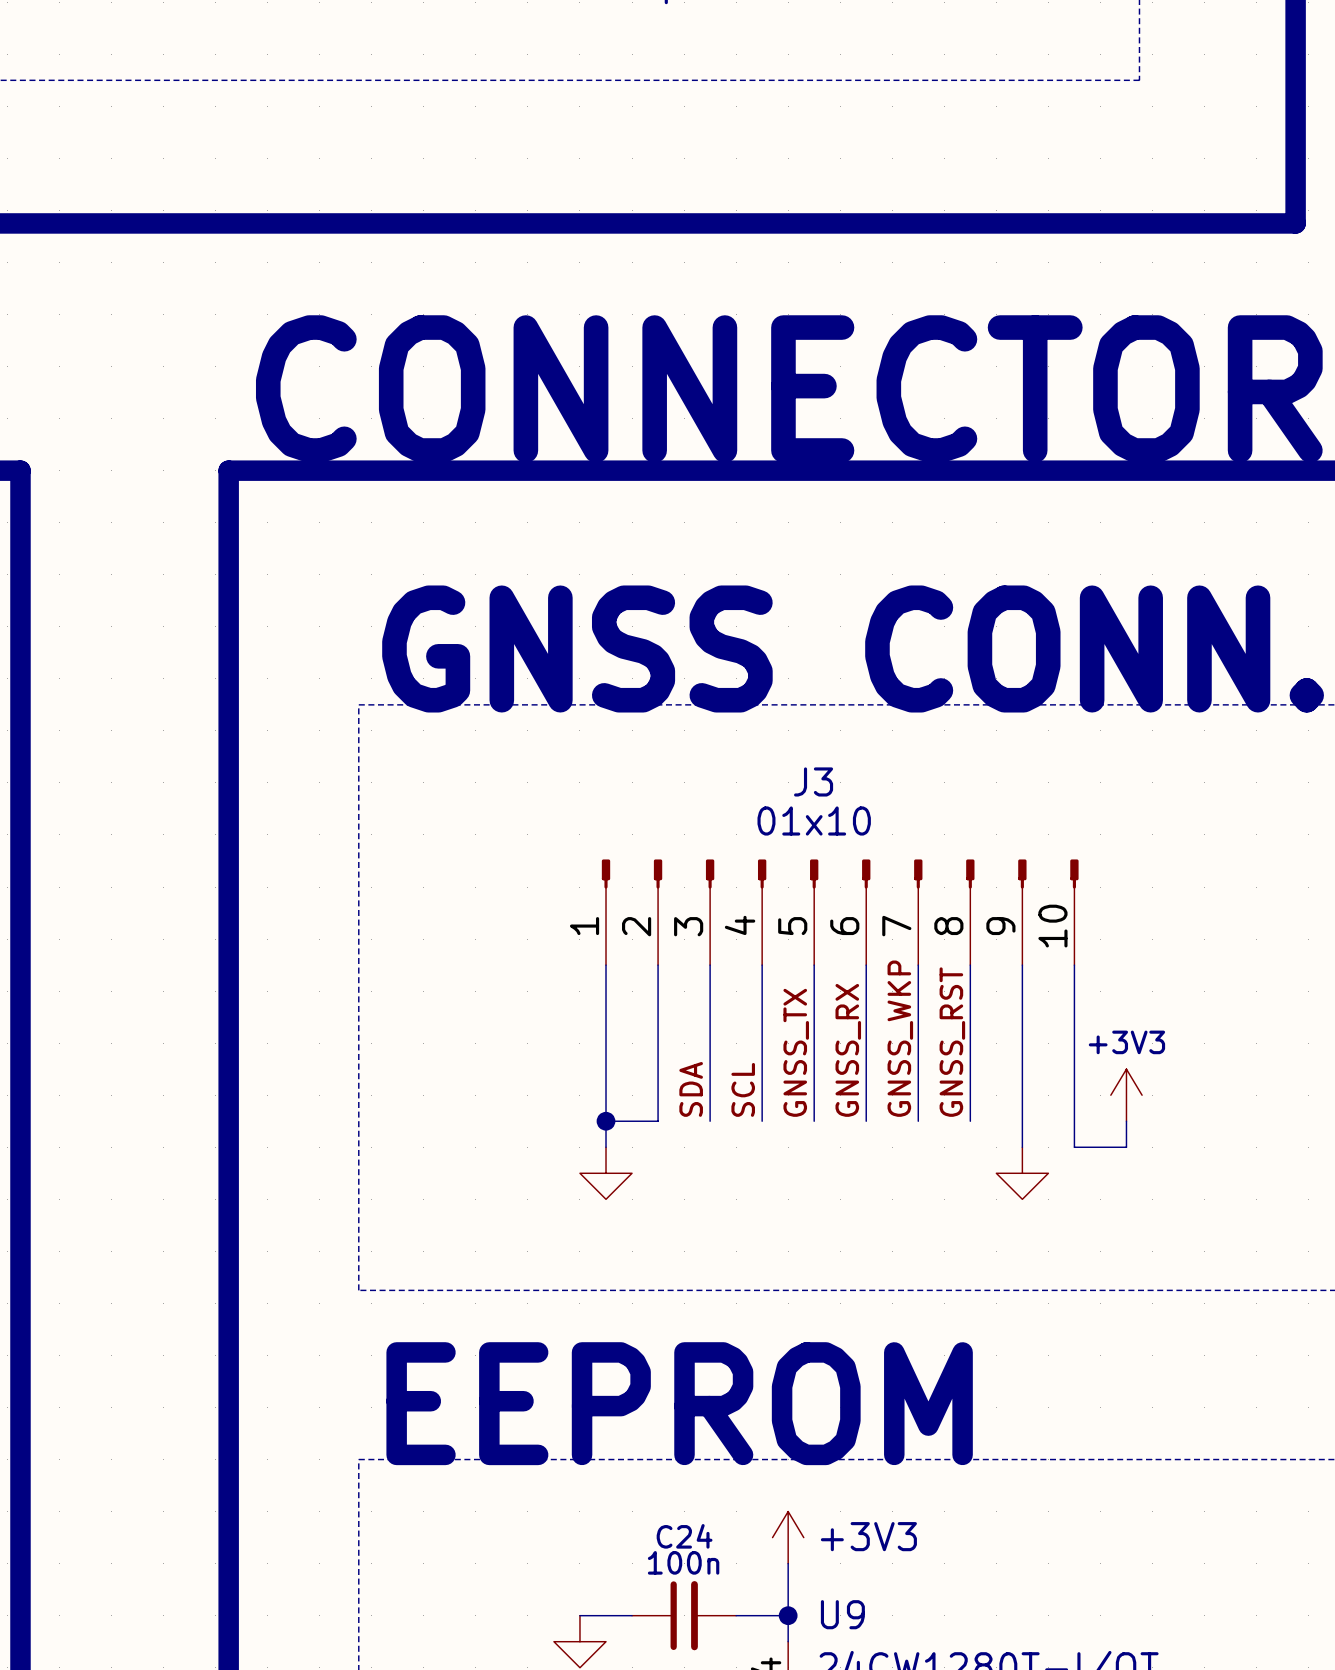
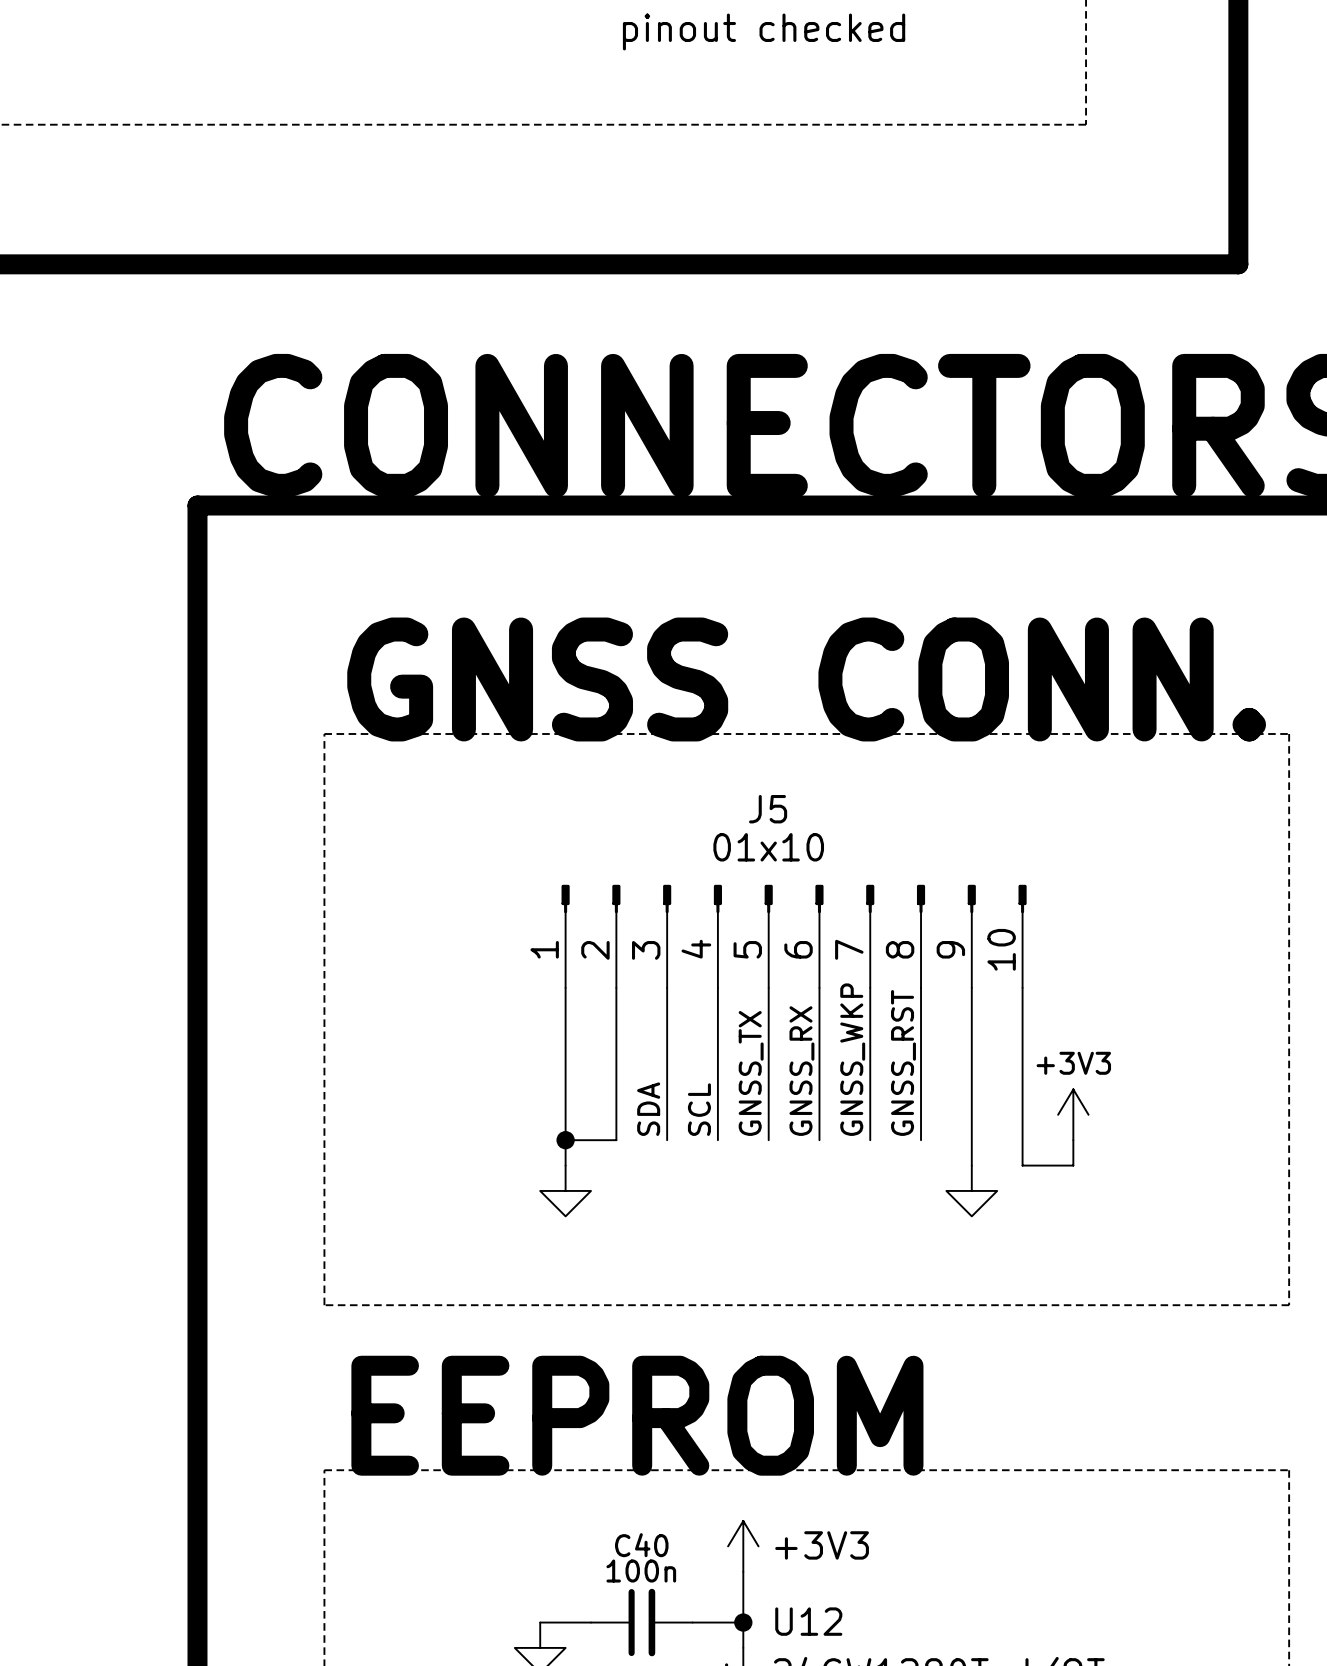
J3 name: J3 (813, 781) -> J5 (768, 809)
C24 name: C24 (684, 1536) -> C40 (641, 1545)
U9 name: U9 (842, 1614) -> U12 (808, 1621)

